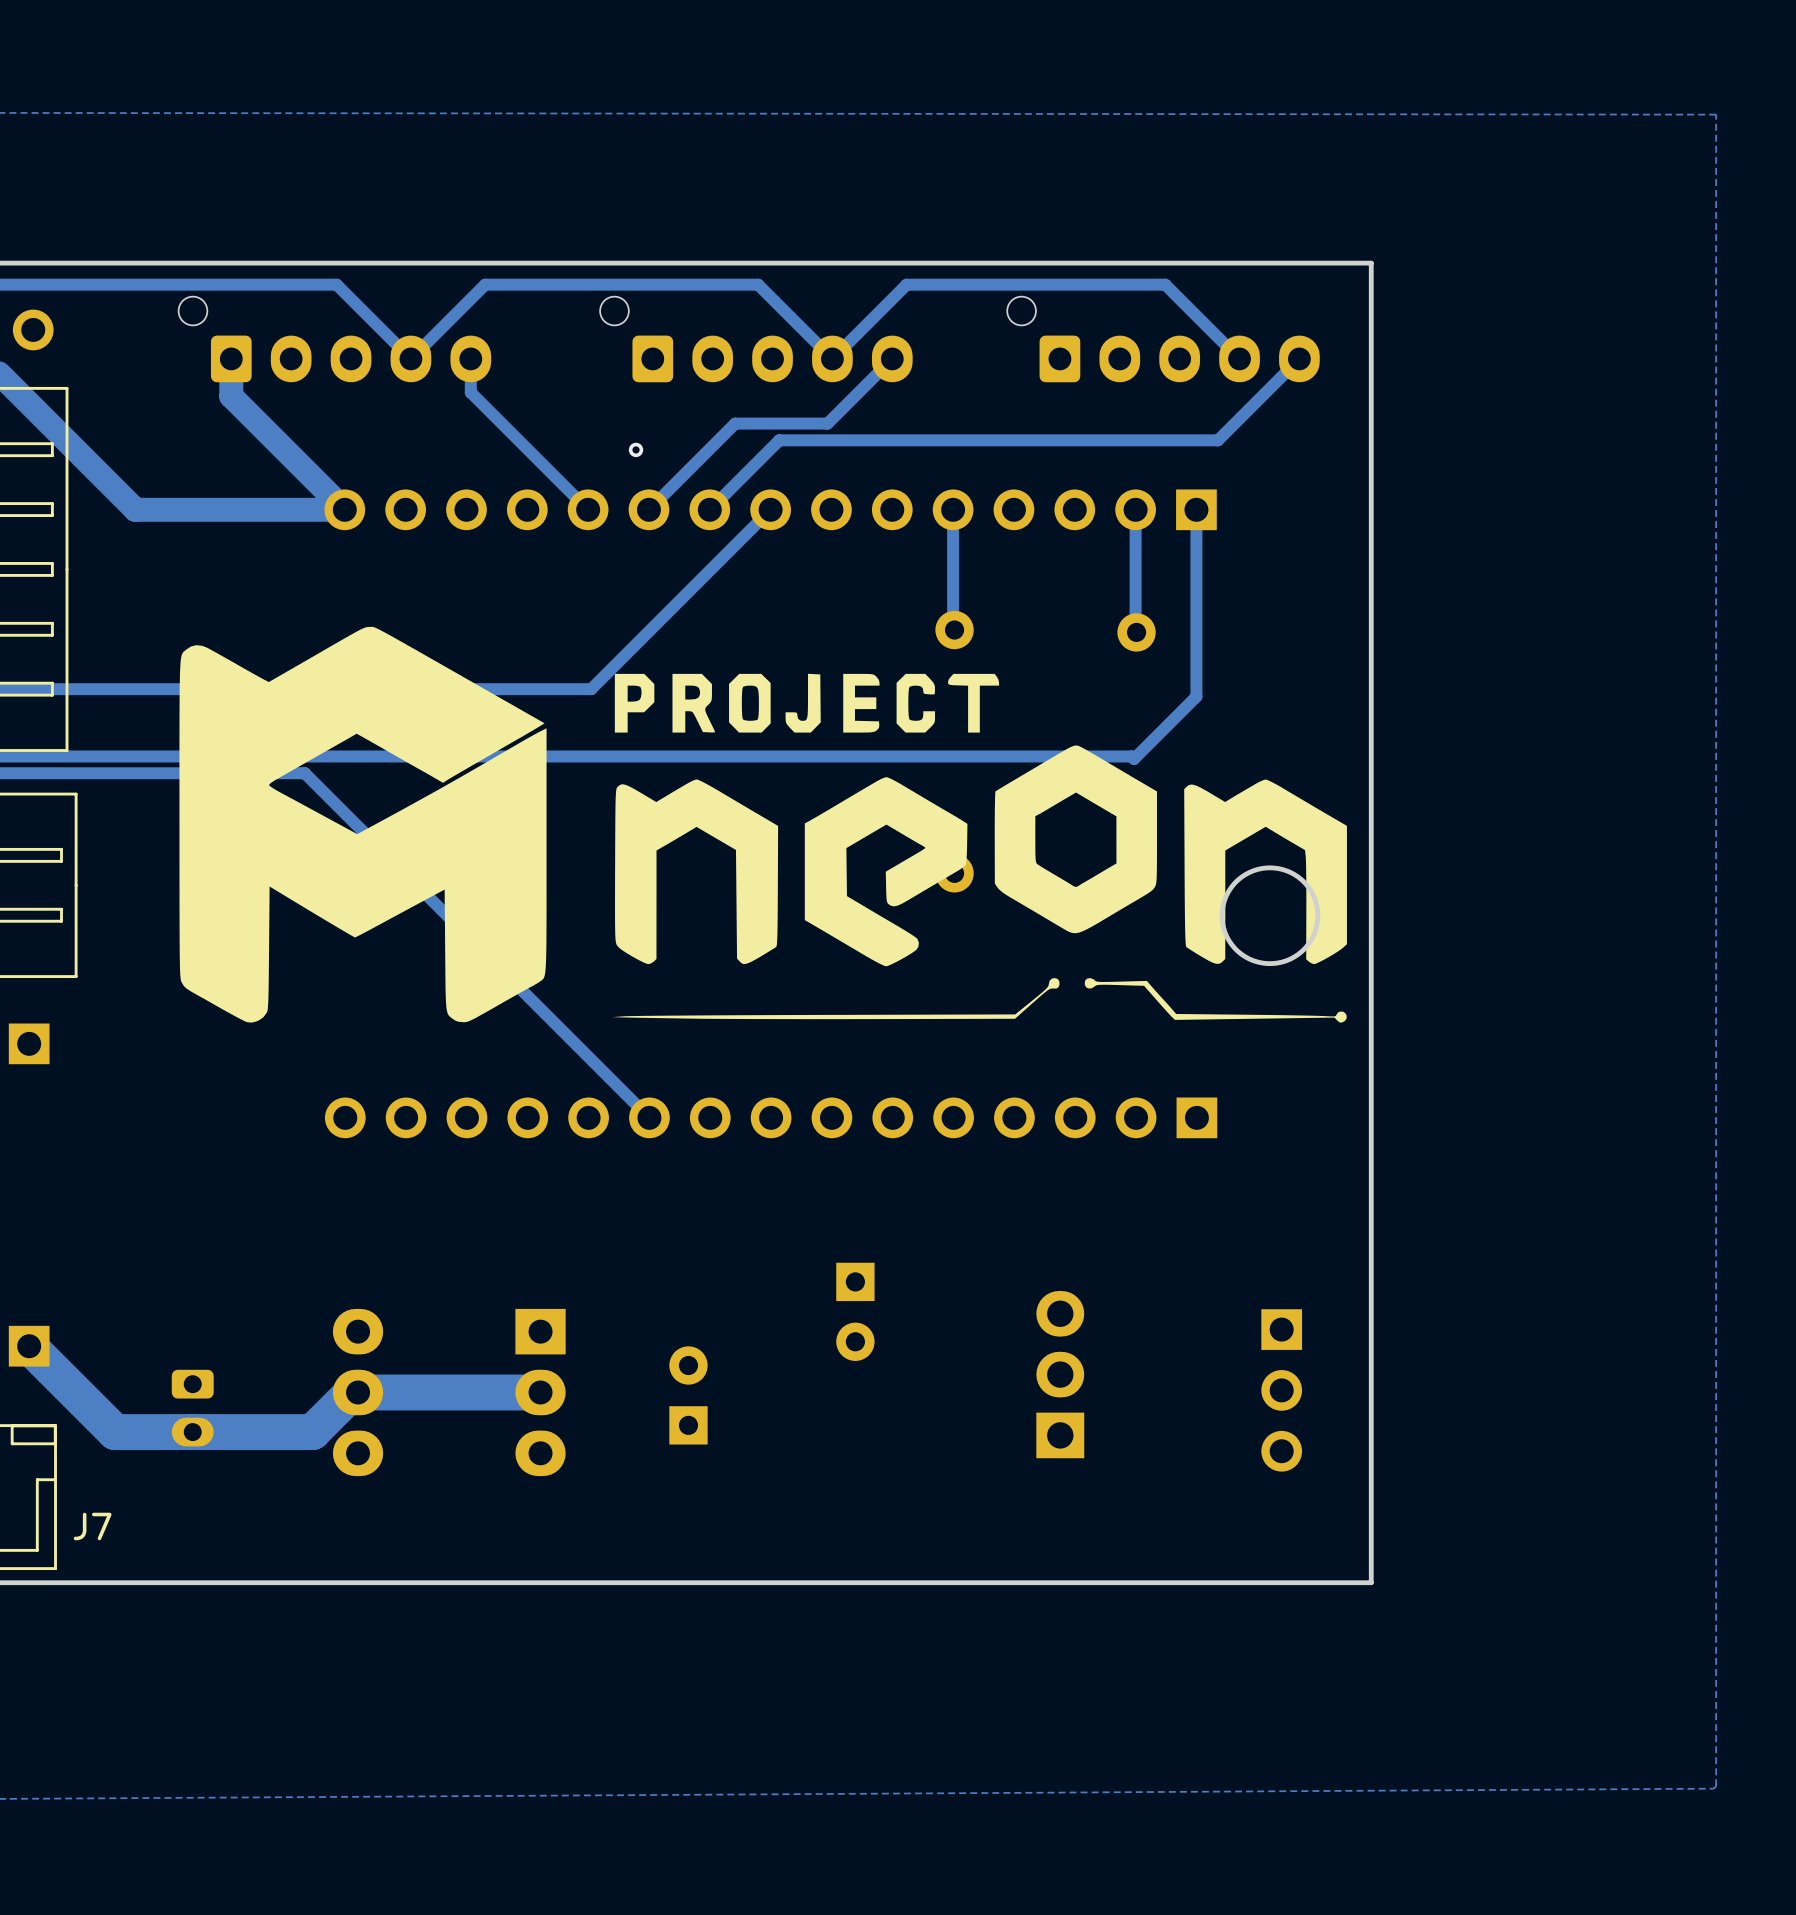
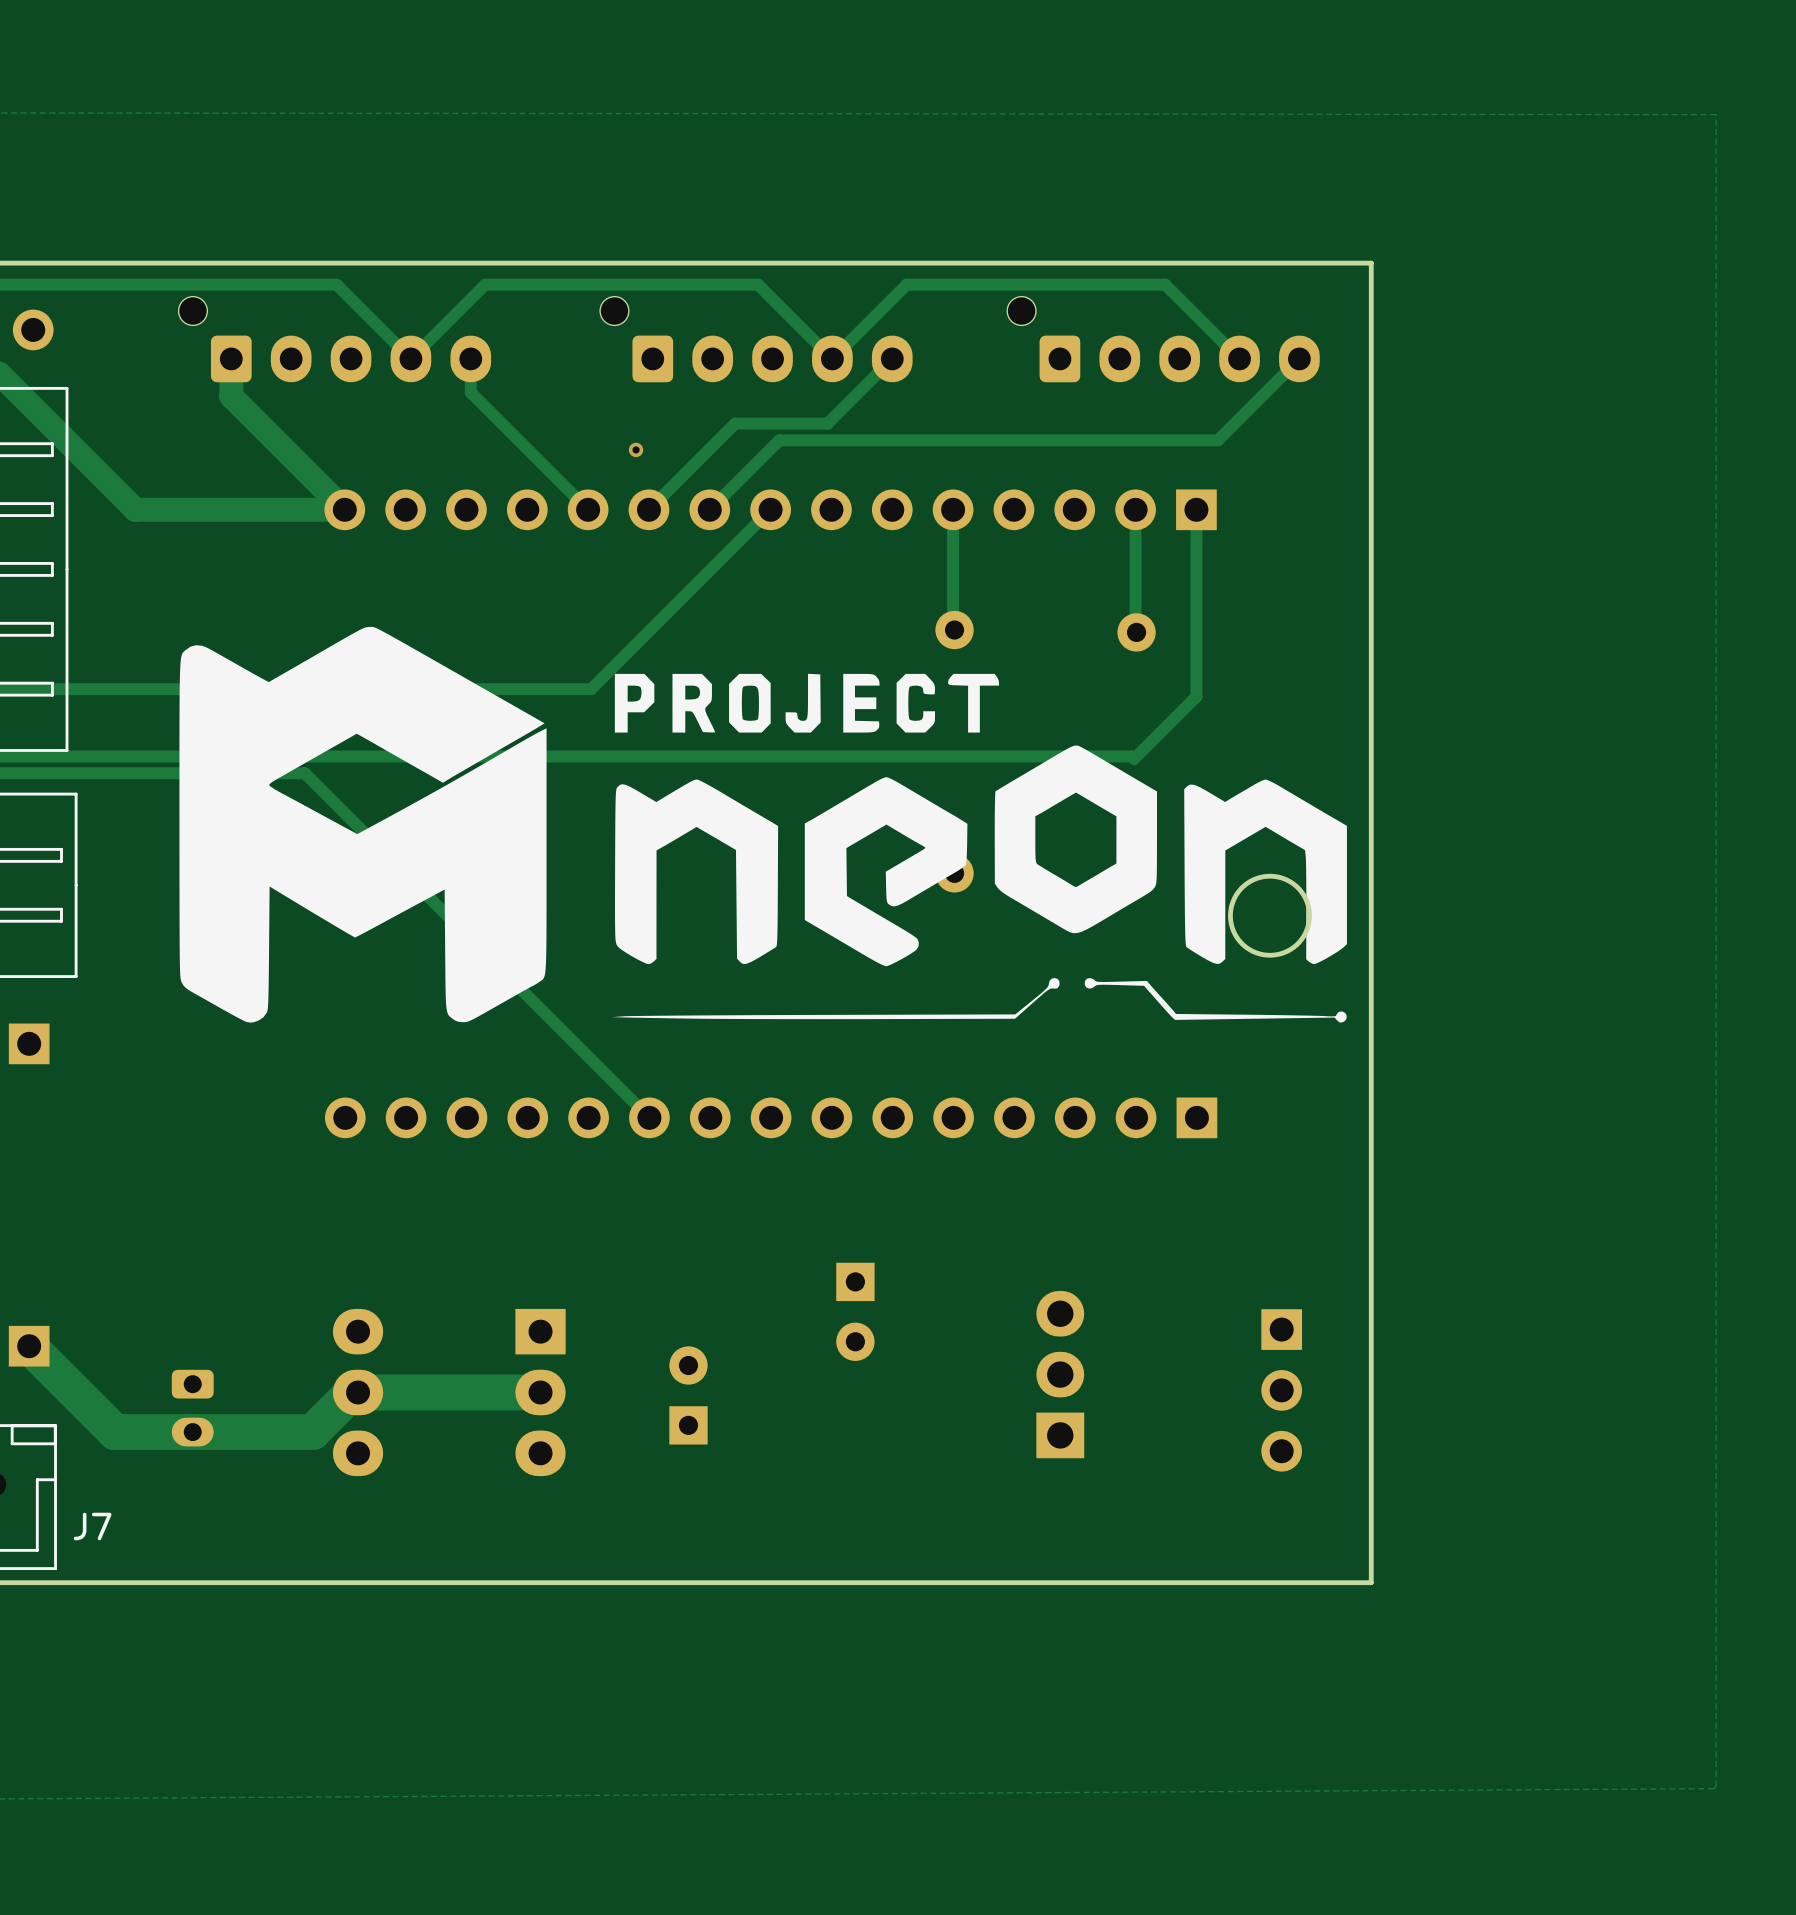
round board edge size: [1219, 865, 1321, 967] -> [1228, 873, 1312, 958]

